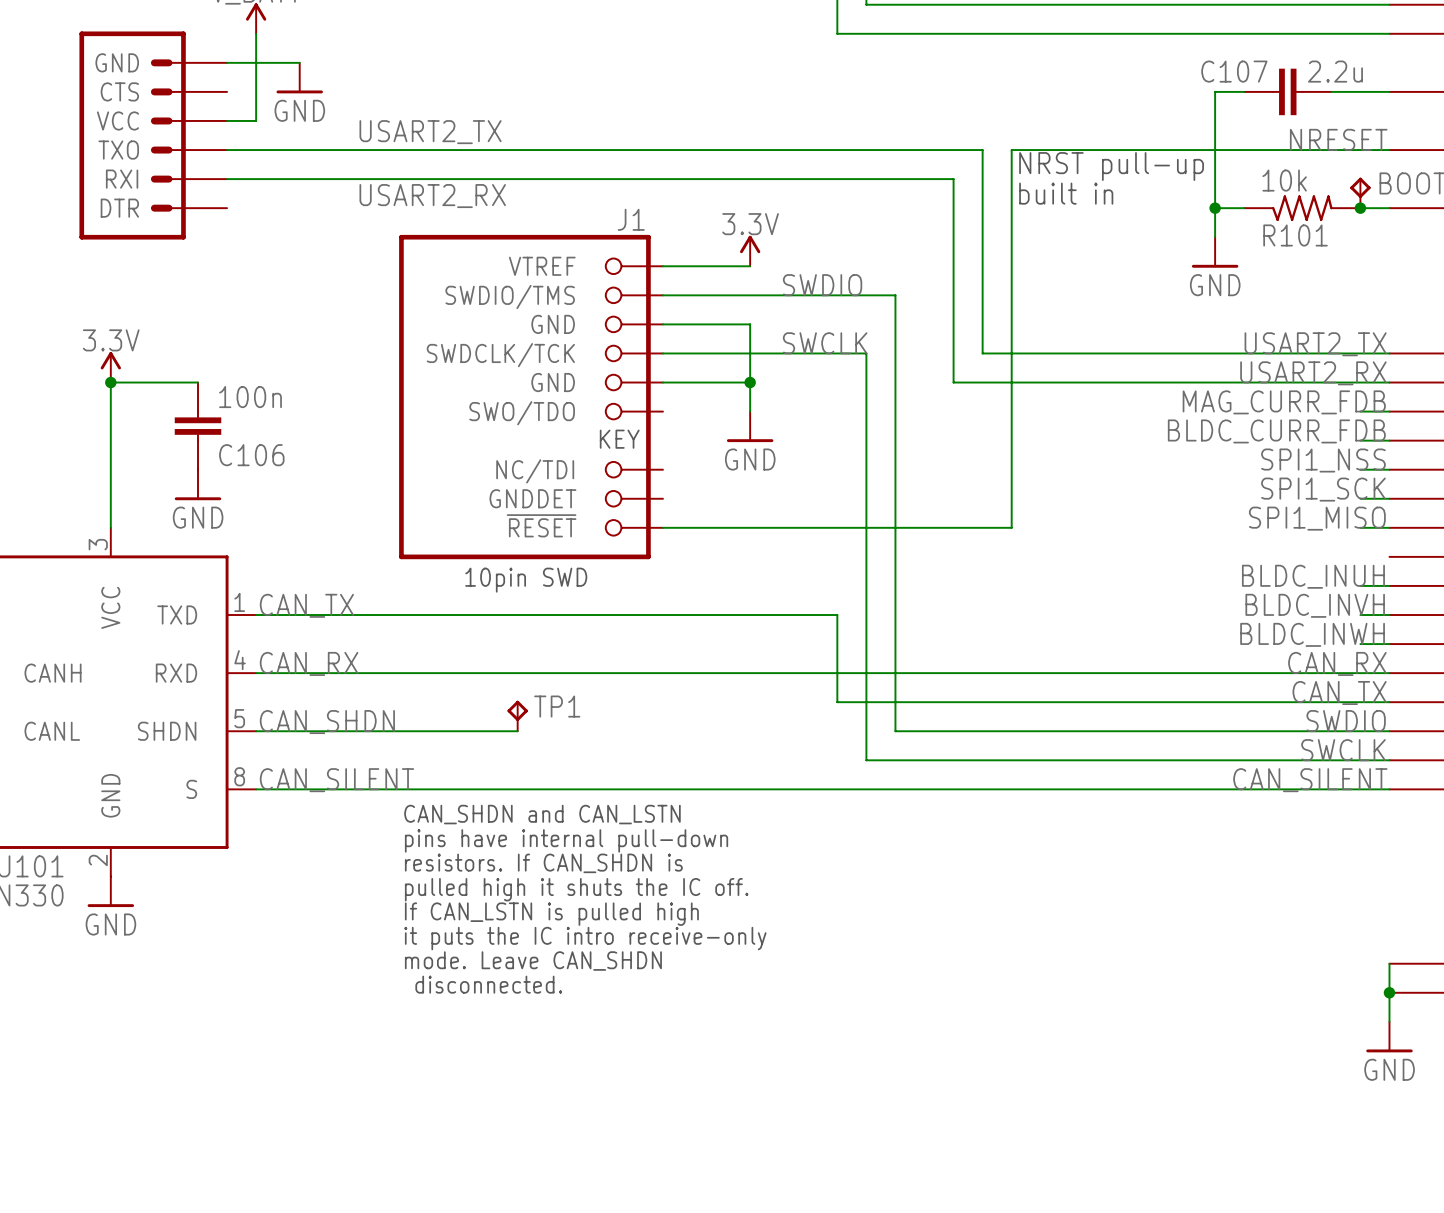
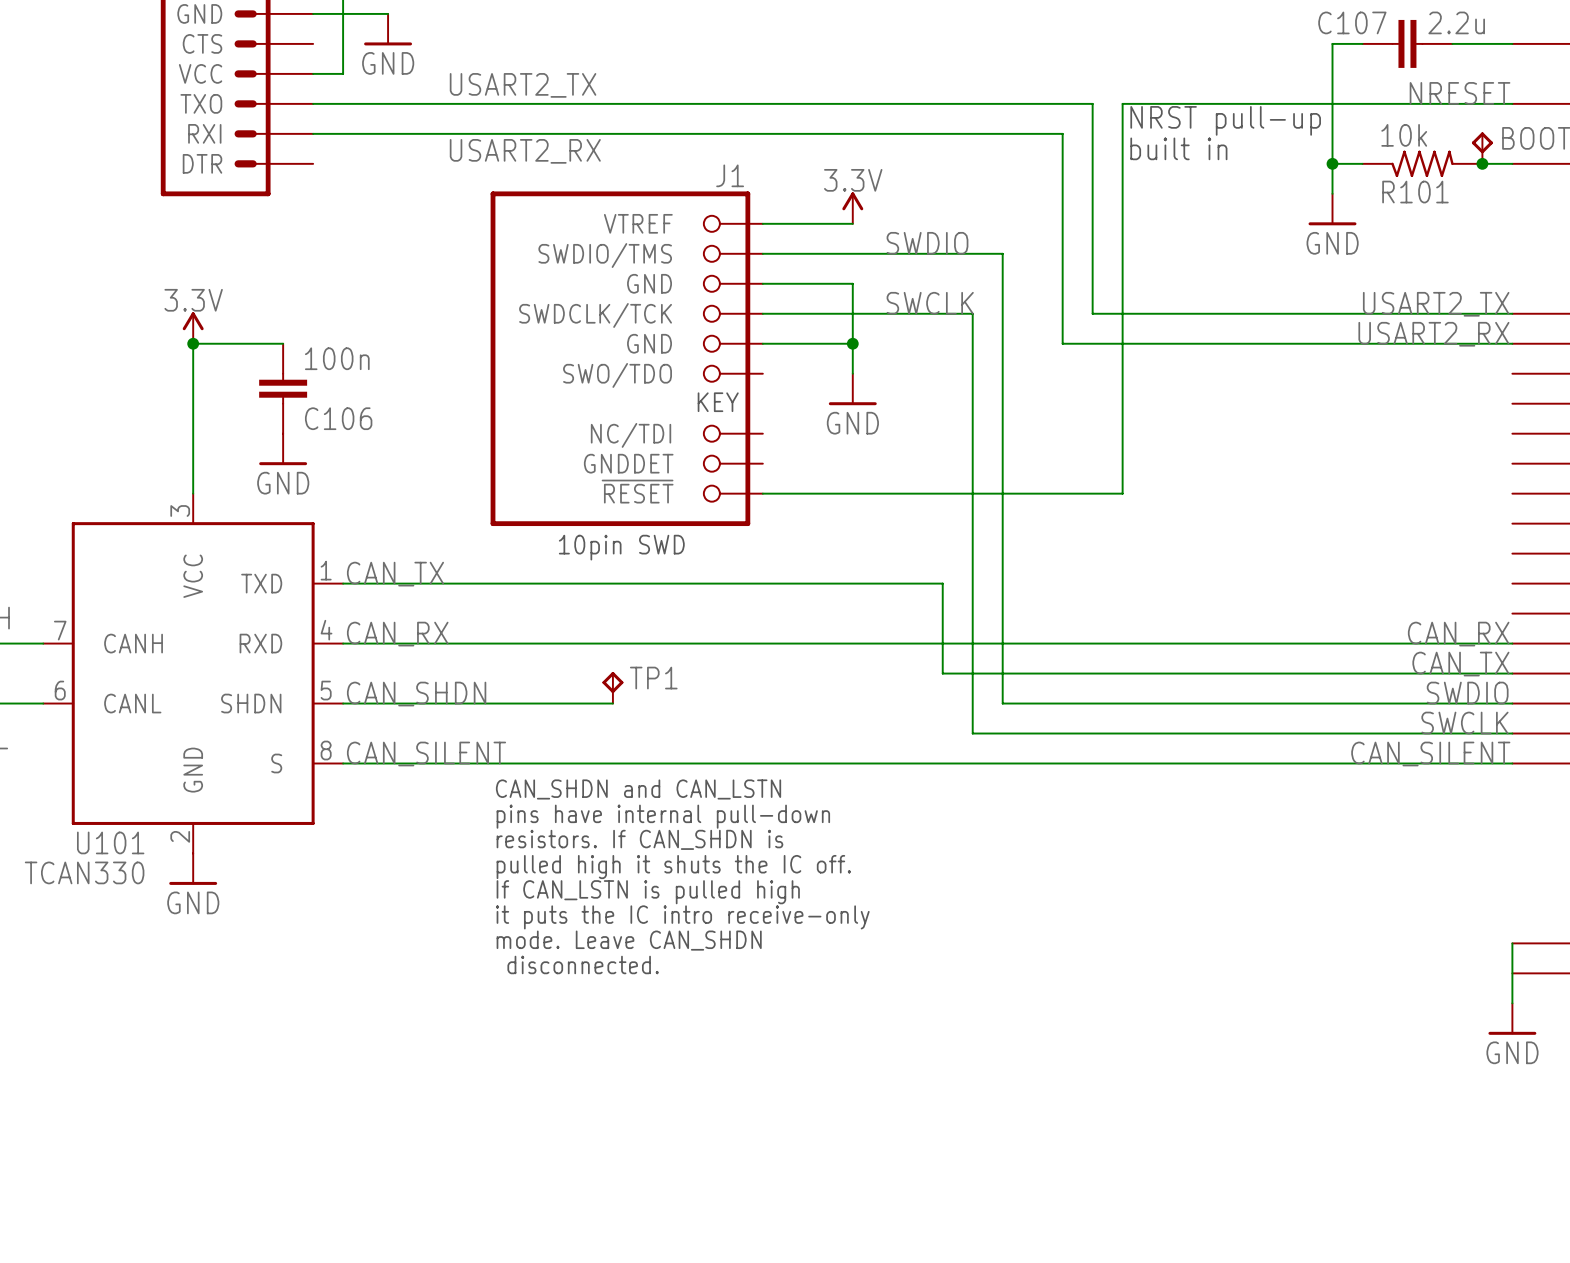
label: MAG_CURR_FDB (1284, 402) -> none
wire: (1360, 411) (1389, 411) -> none
label: BLDC_CURR_FDB (1276, 431) -> none
wire: (1360, 440) (1389, 440) -> none
label: SPI1_NSS (1323, 460) -> none
wire: (1360, 469) (1389, 469) -> none
label: SPI1_SCK (1323, 489) -> none
wire: (1360, 498) (1389, 498) -> none
label: SPI1_MISO (1317, 518) -> none
wire: (1360, 527) (1389, 527) -> none
label: BLDC_INUH (1313, 576) -> none
wire: (1360, 585) (1389, 585) -> none
label: BLDC_INVH (1315, 605) -> none
wire: (1360, 615) (1389, 615) -> none
label: BLDC_INWH (1312, 634) -> none
wire: (1360, 644) (1389, 644) -> none
junction: (1389, 992) -> none

